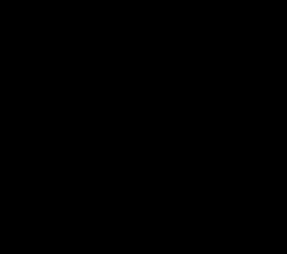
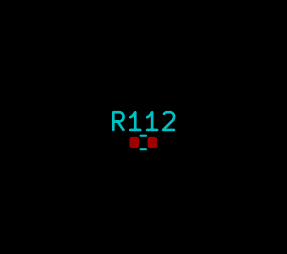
R112: none -> (143, 142)

